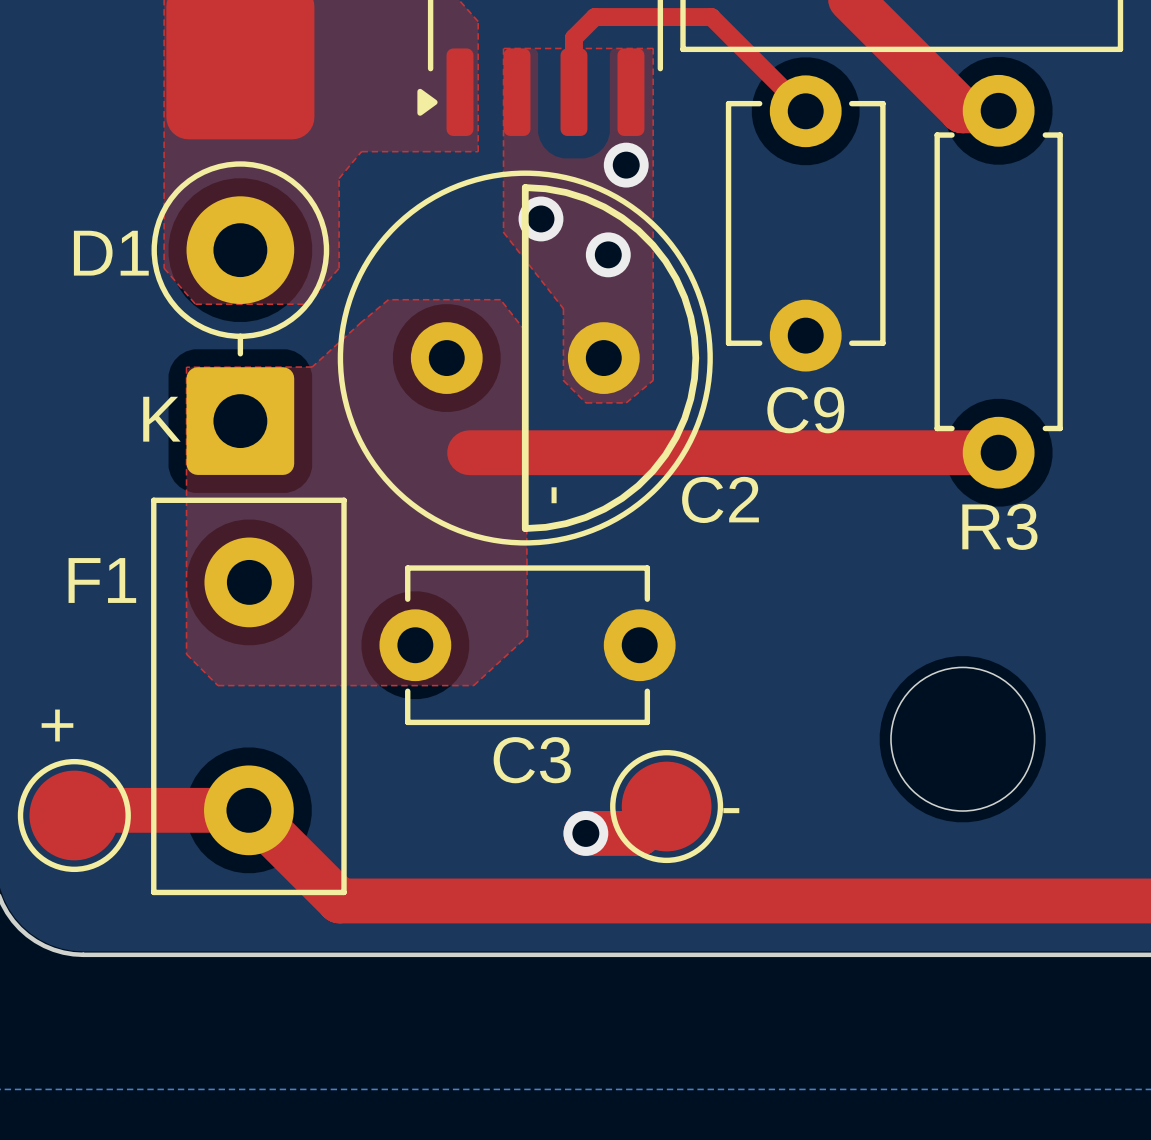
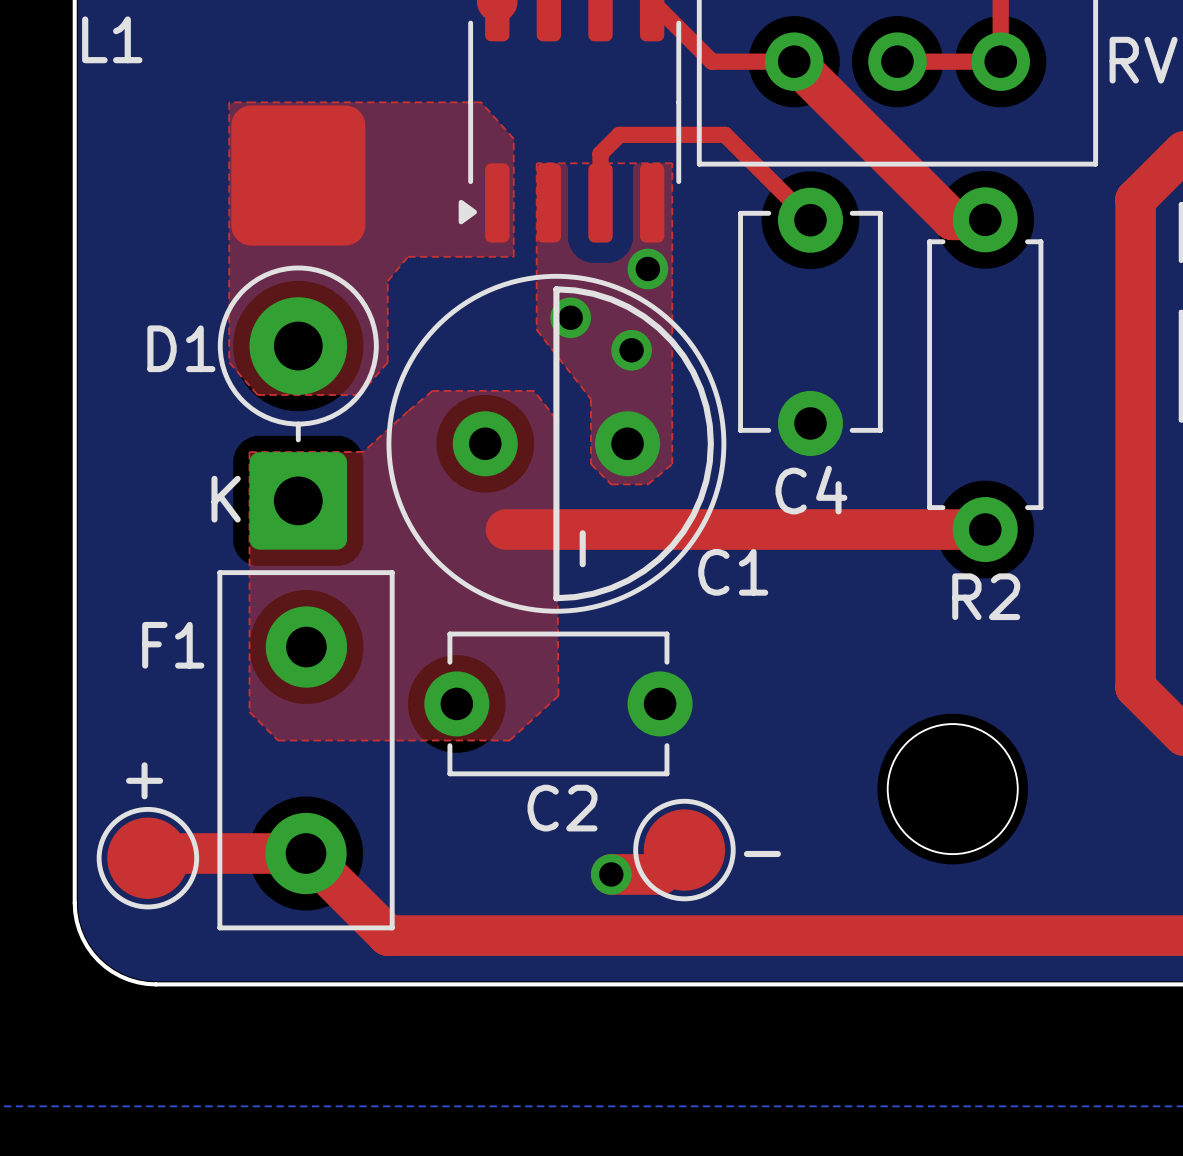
C9 name: C9 (805, 410) -> C4 (811, 490)
C2 name: C2 (720, 499) -> C1 (733, 572)
R3 name: R3 (999, 526) -> R2 (986, 596)
C3 name: C3 (532, 760) -> C2 (562, 808)

